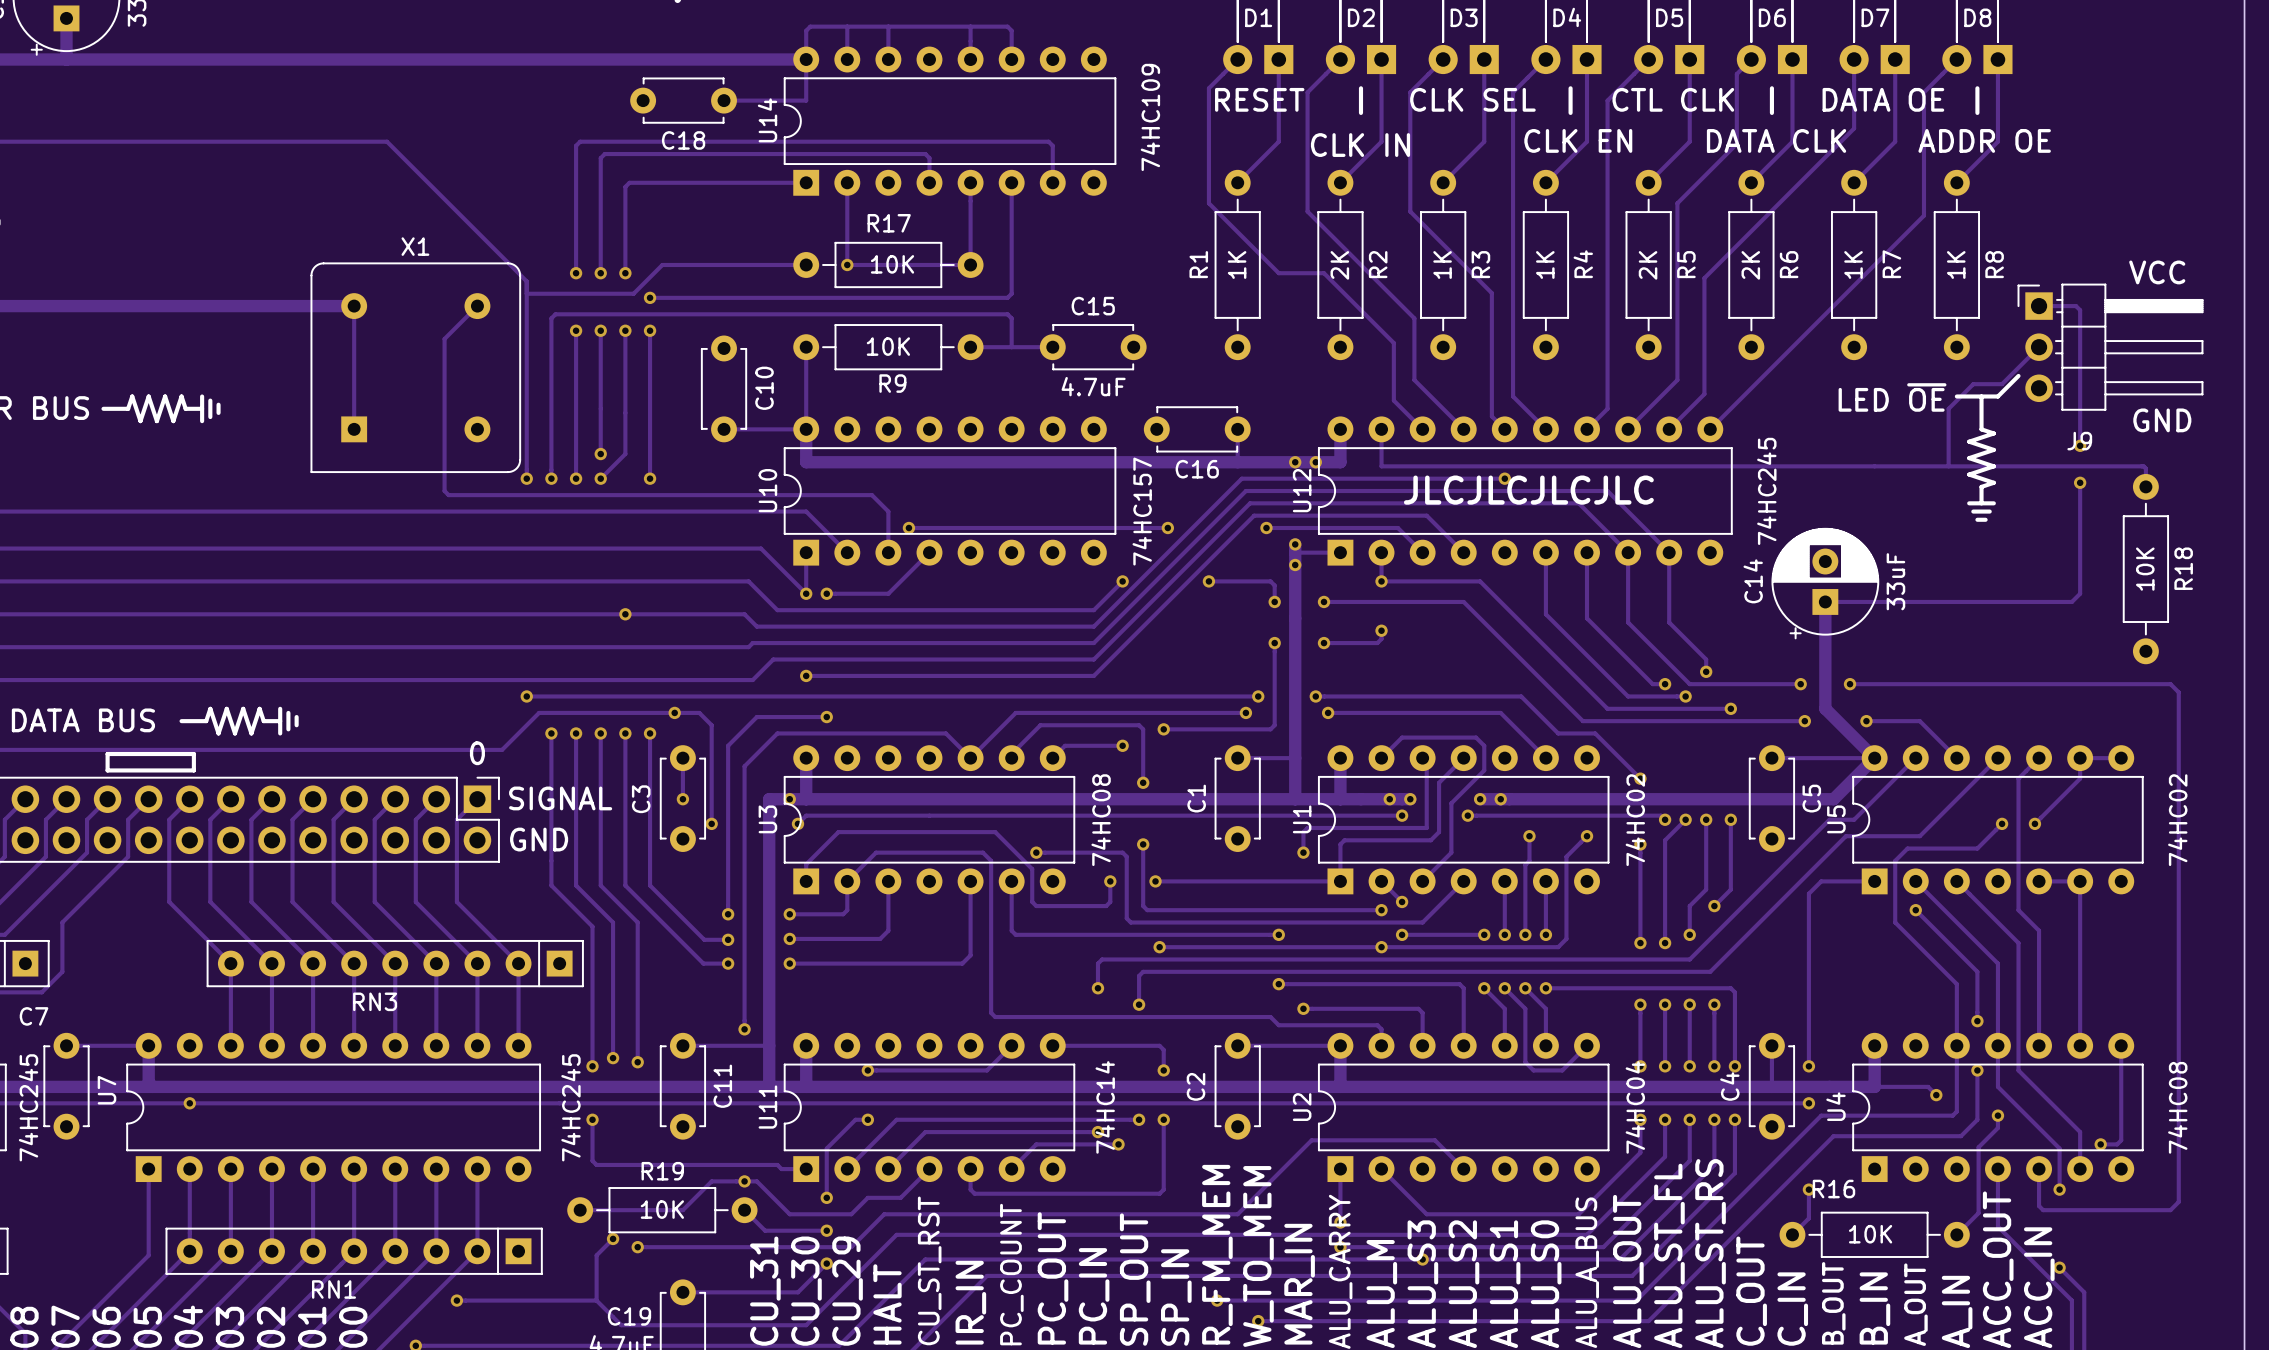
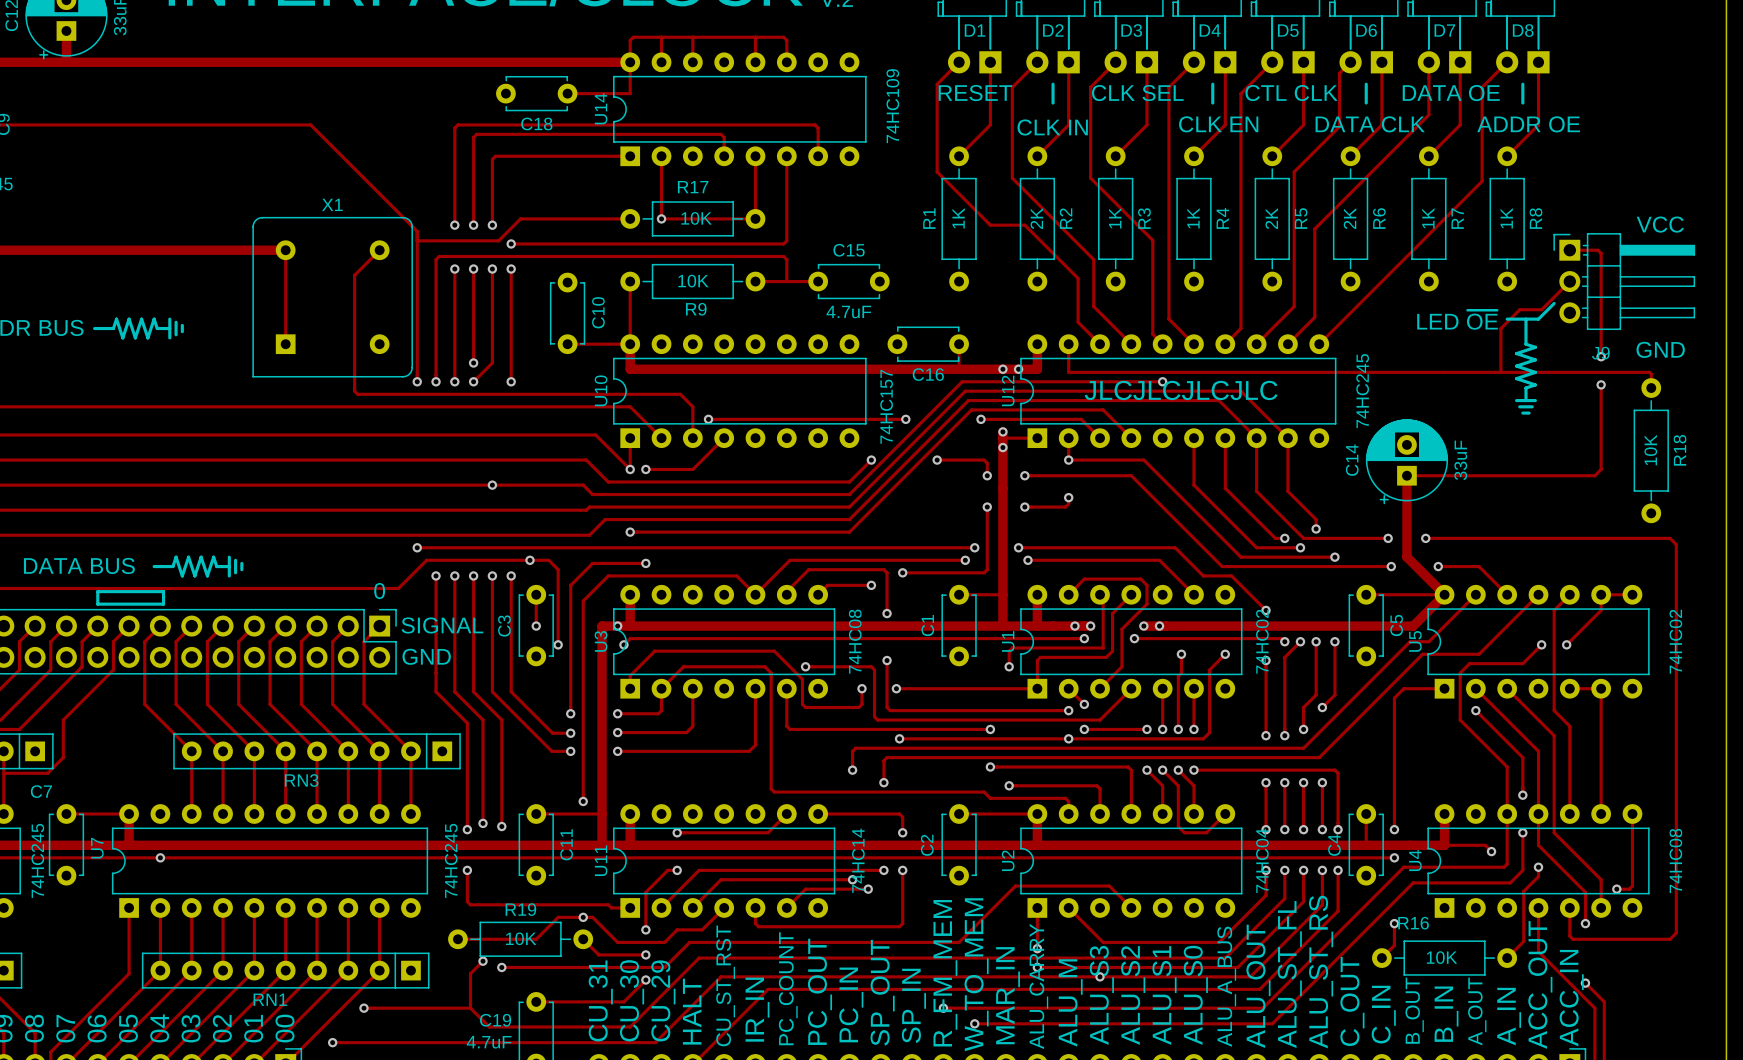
text position: GND (2162, 420) -> GND (1660, 349)

